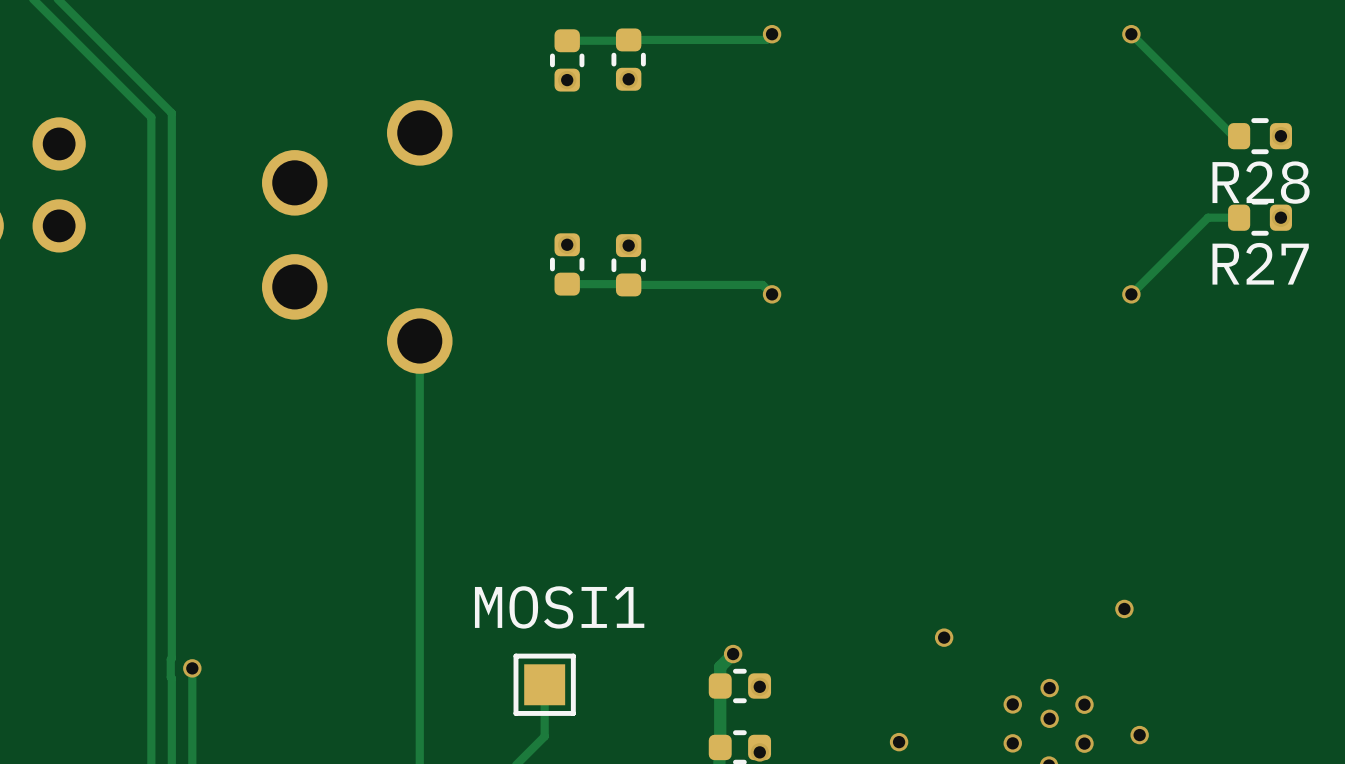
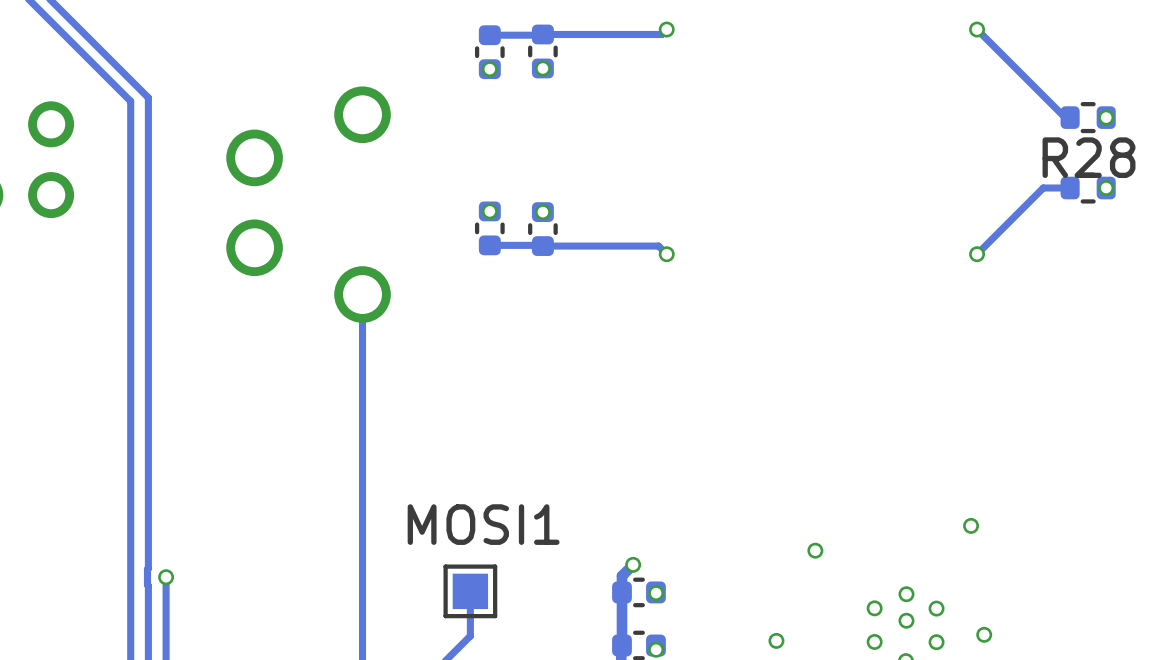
R27 name: R27 (1260, 263) -> none

